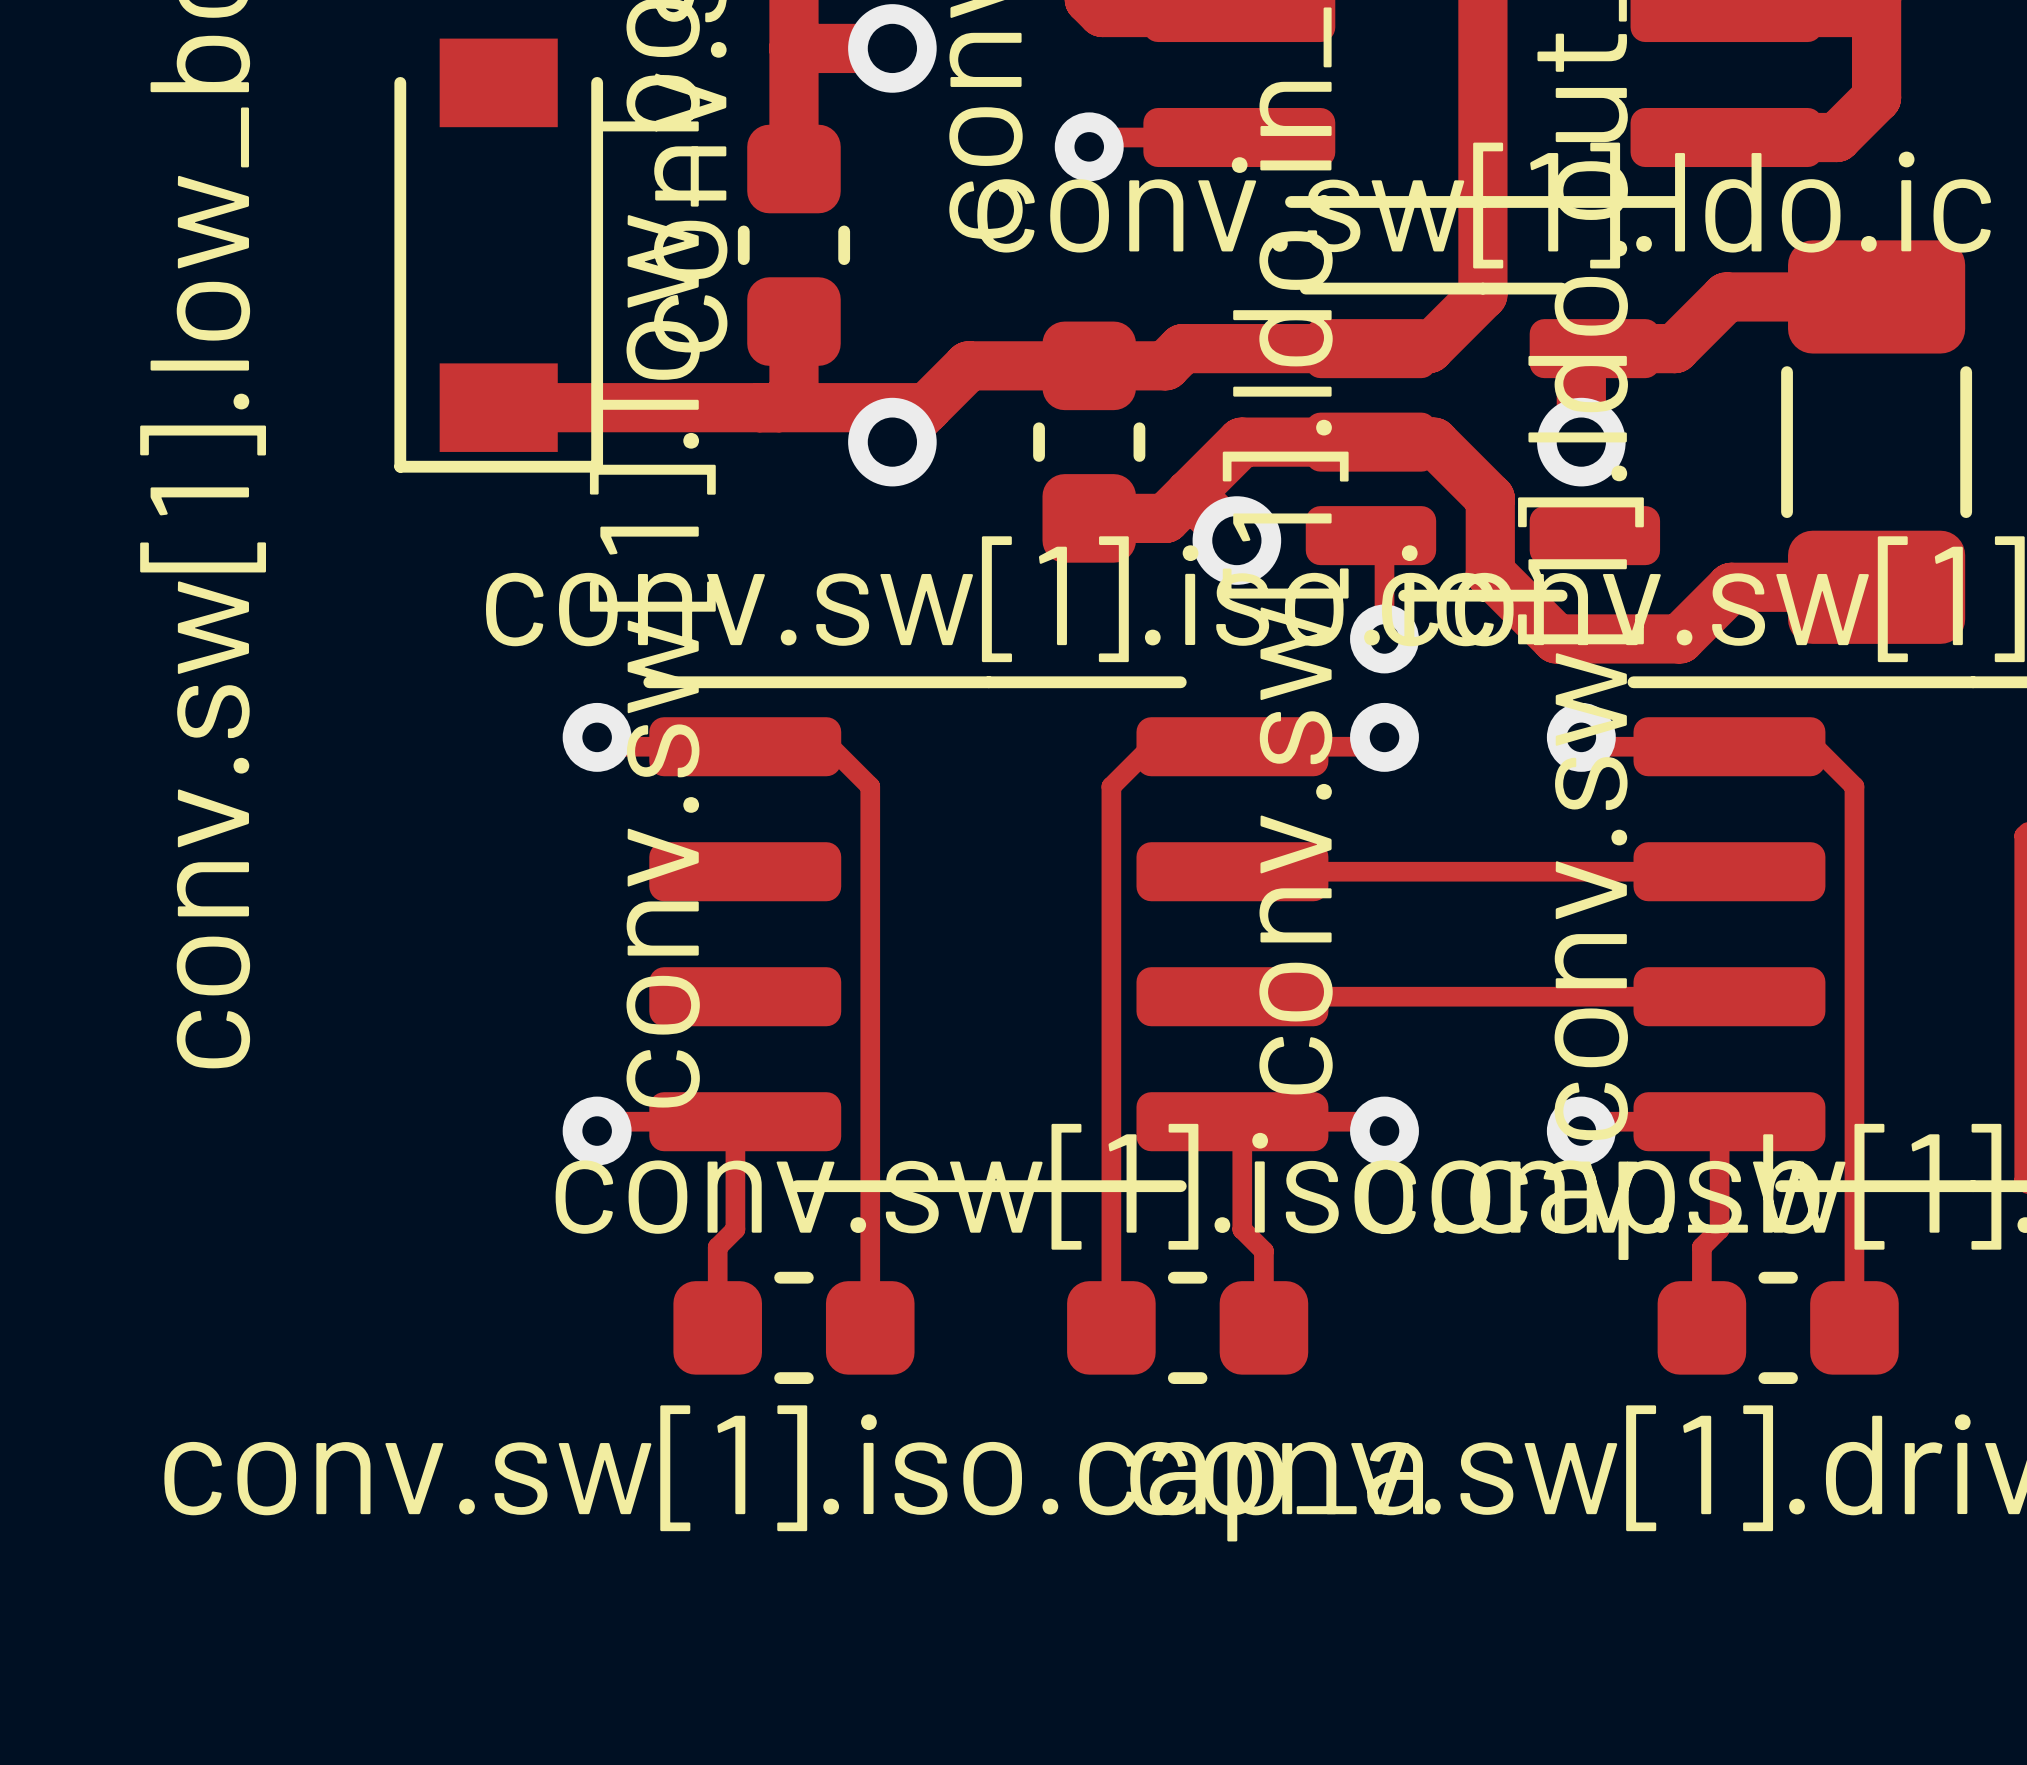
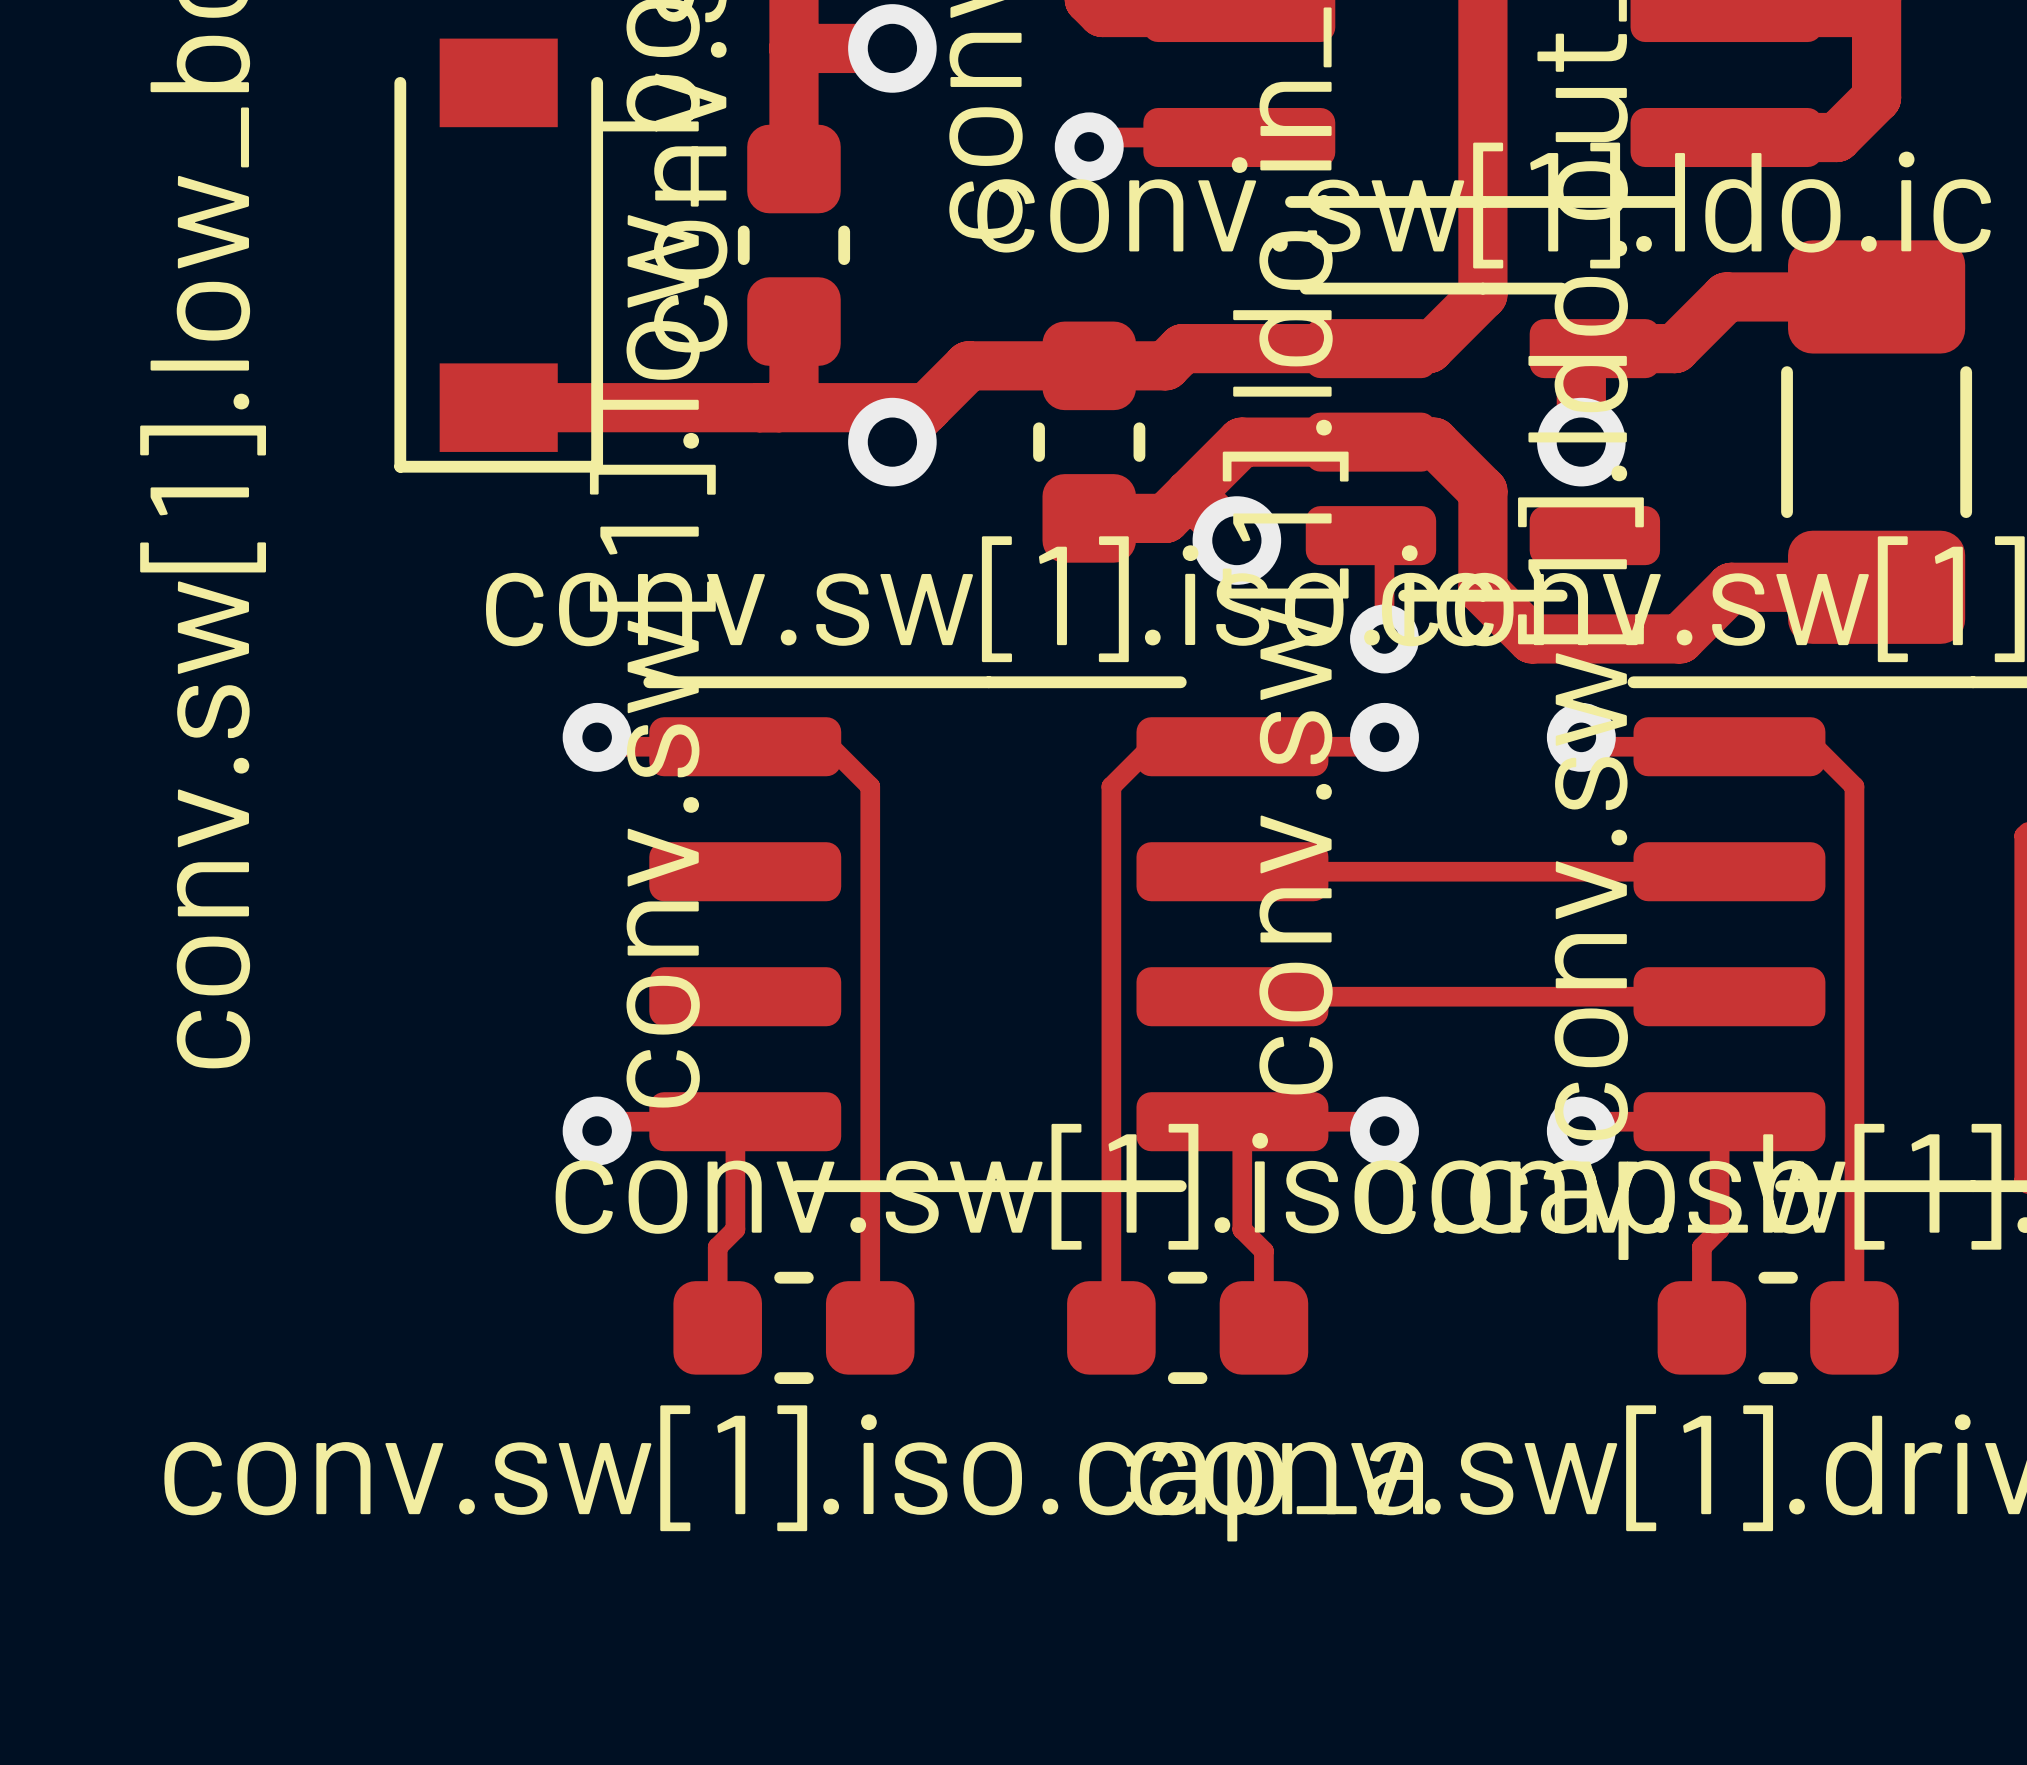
track: (1482, 491) (1490, 498) (1490, 572) (1556, 638) -> (1482, 491) (1482, 589) (1532, 638) (1556, 638)

